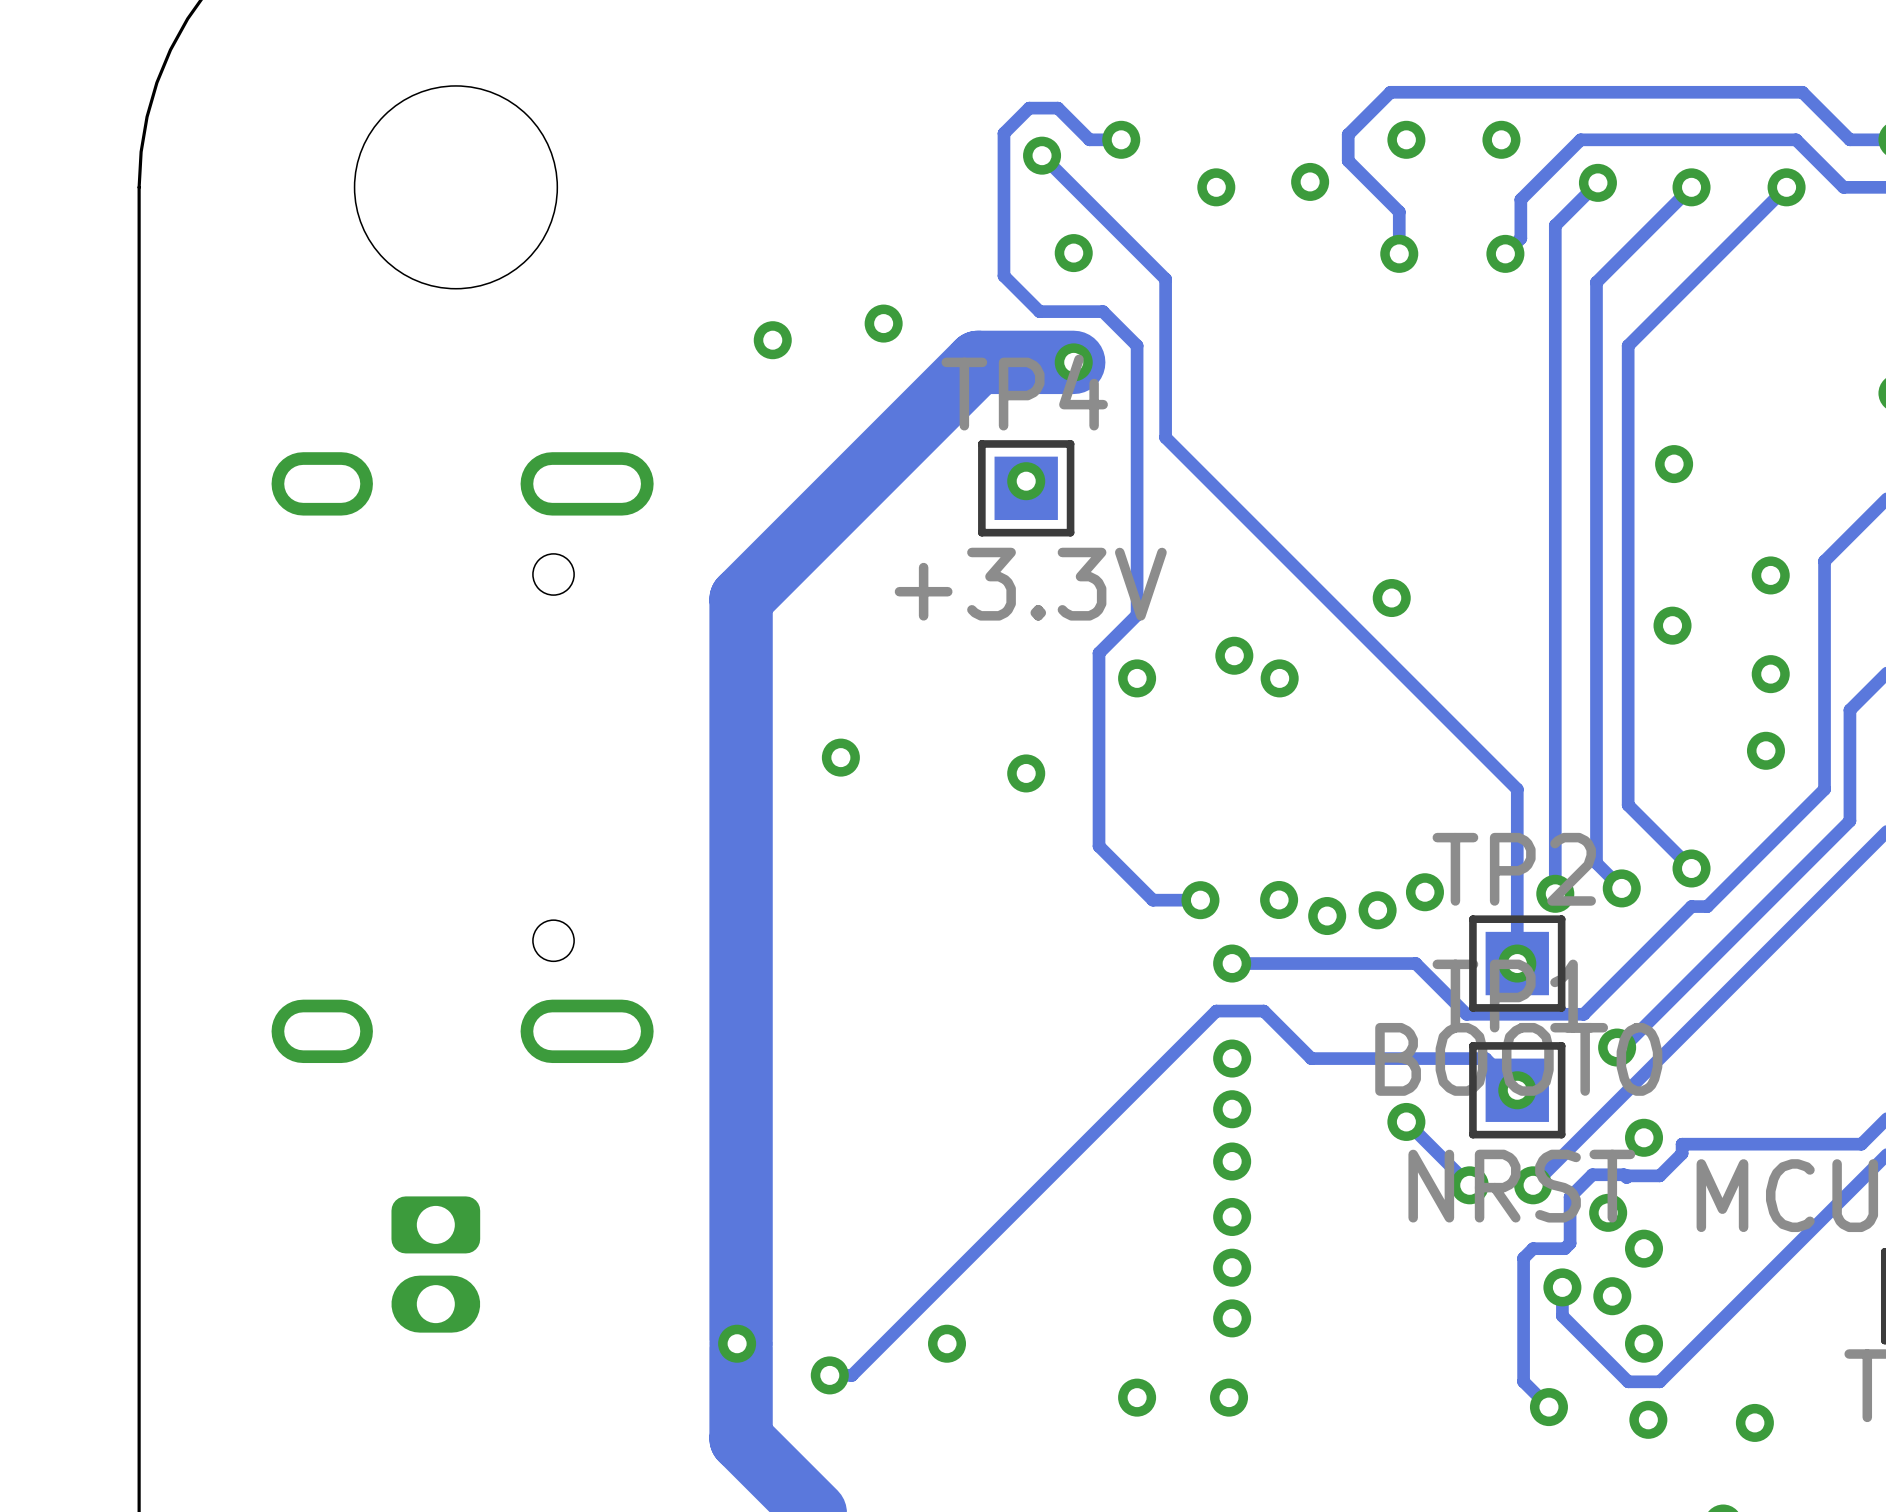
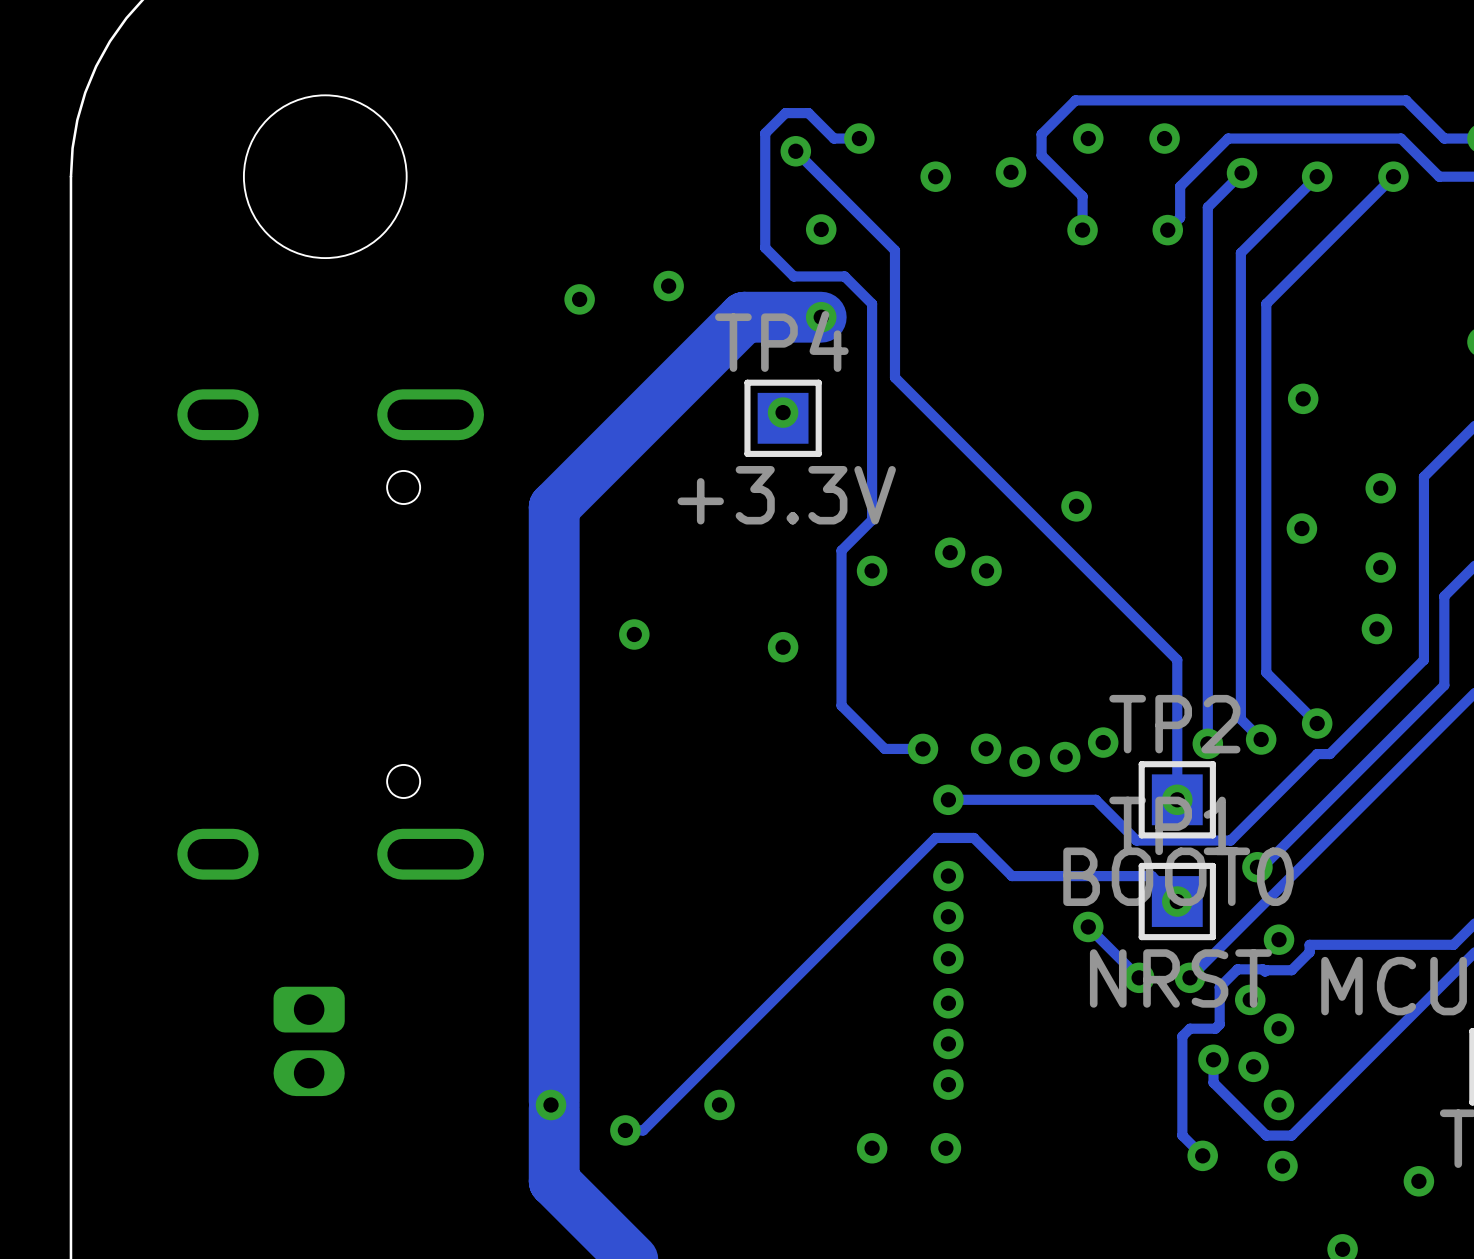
via: (1754, 1422) -> none
via: none -> (1418, 1181)

